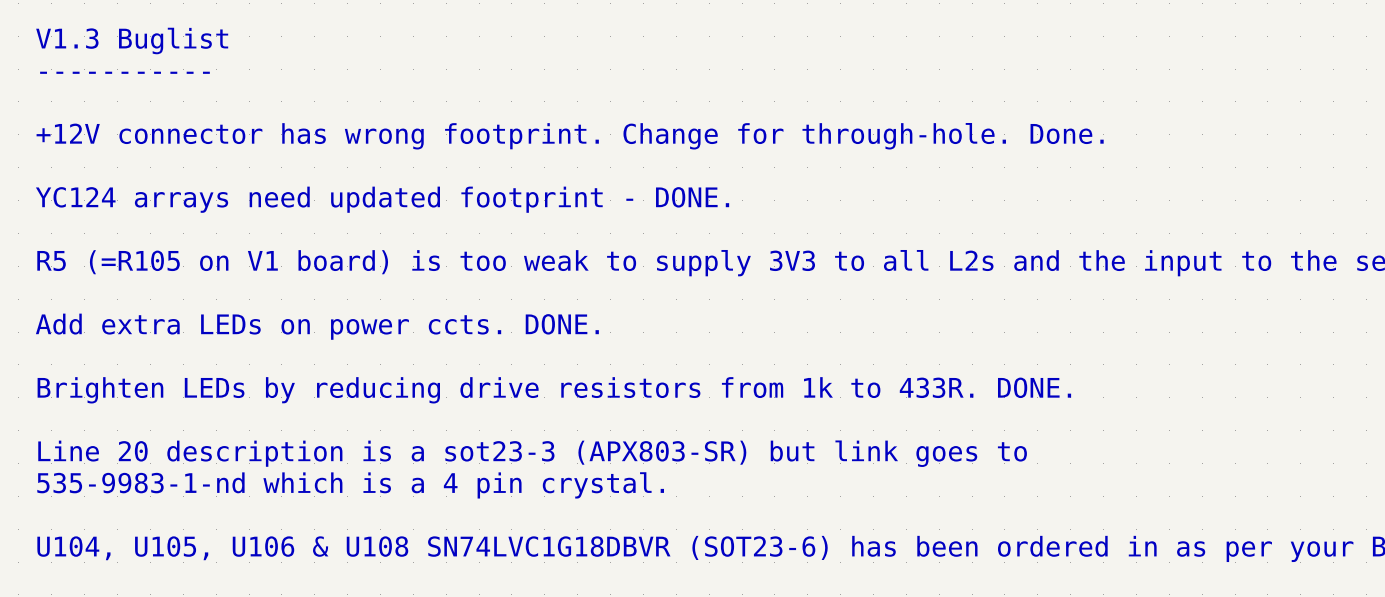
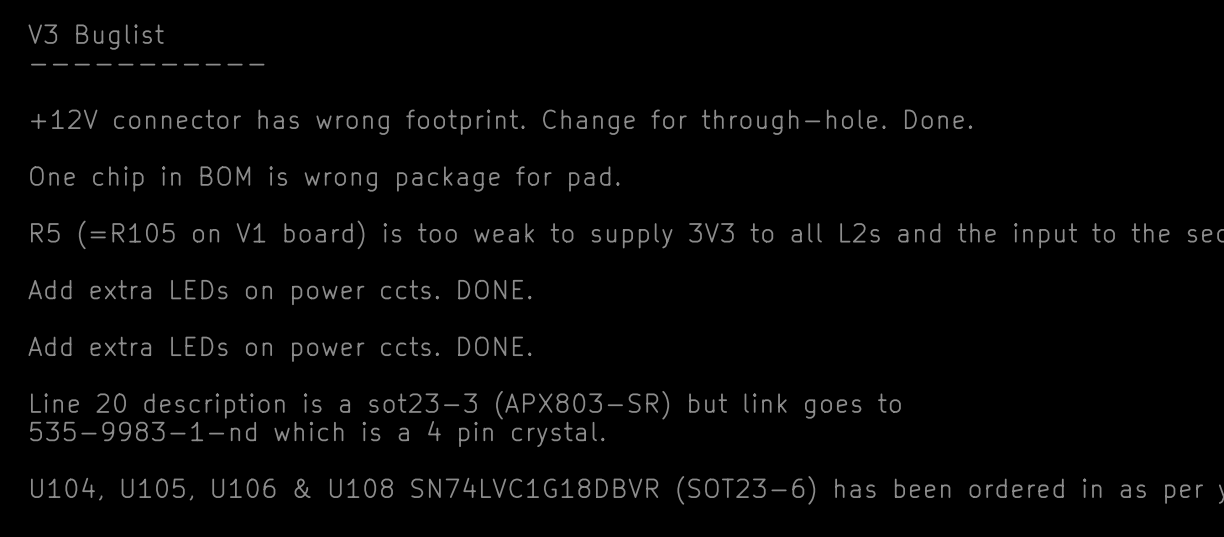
text: V1.3 Buglist (132, 41) -> V3 Buglist (96, 37)
text: YC124 arrays need updated footprint - DONE. (382, 199) -> One chip in BOM is wrong package for pad. (324, 178)
text: Brighten LEDs by reducing drive resistors from 1k to 433R. DONE. (554, 390) -> Add extra LEDs on power ccts. DONE. (279, 349)

